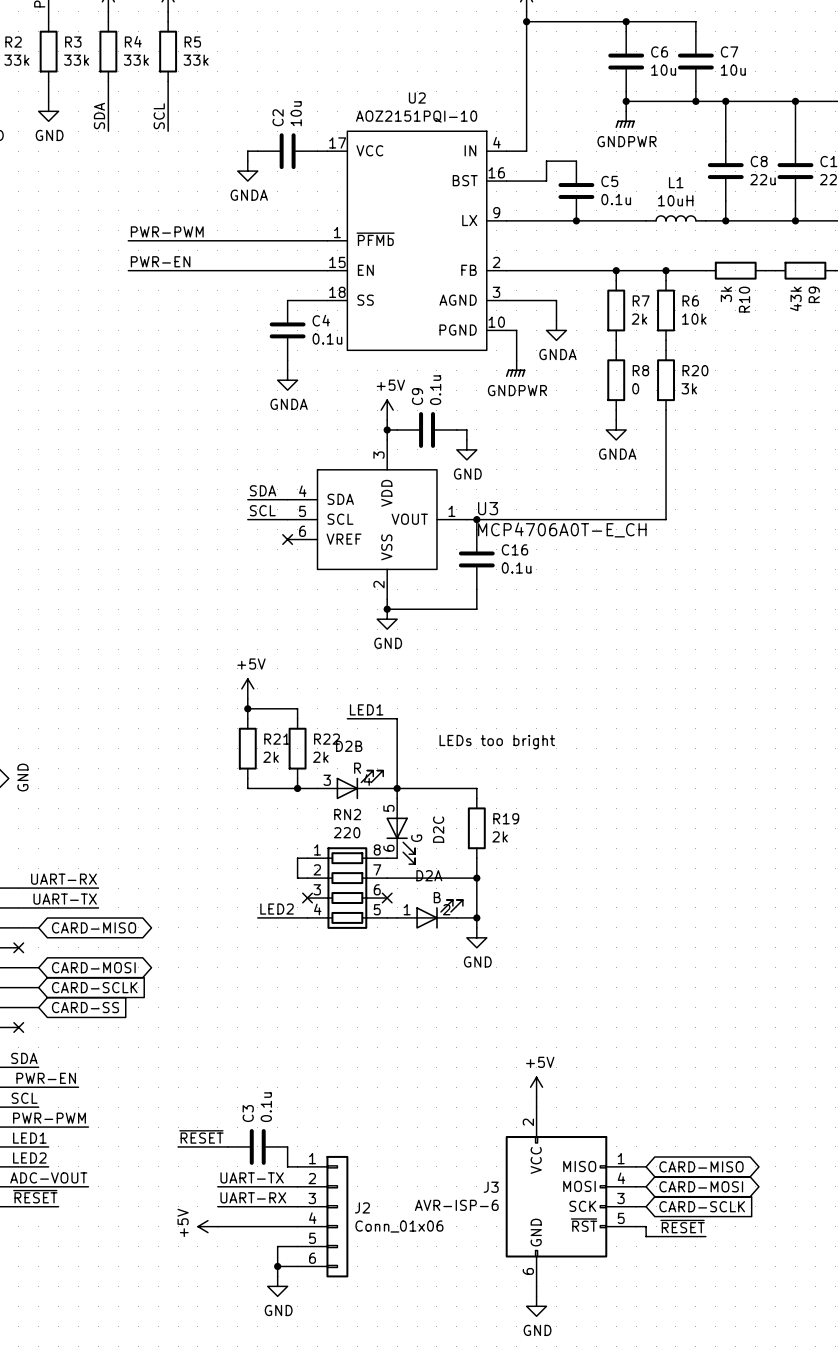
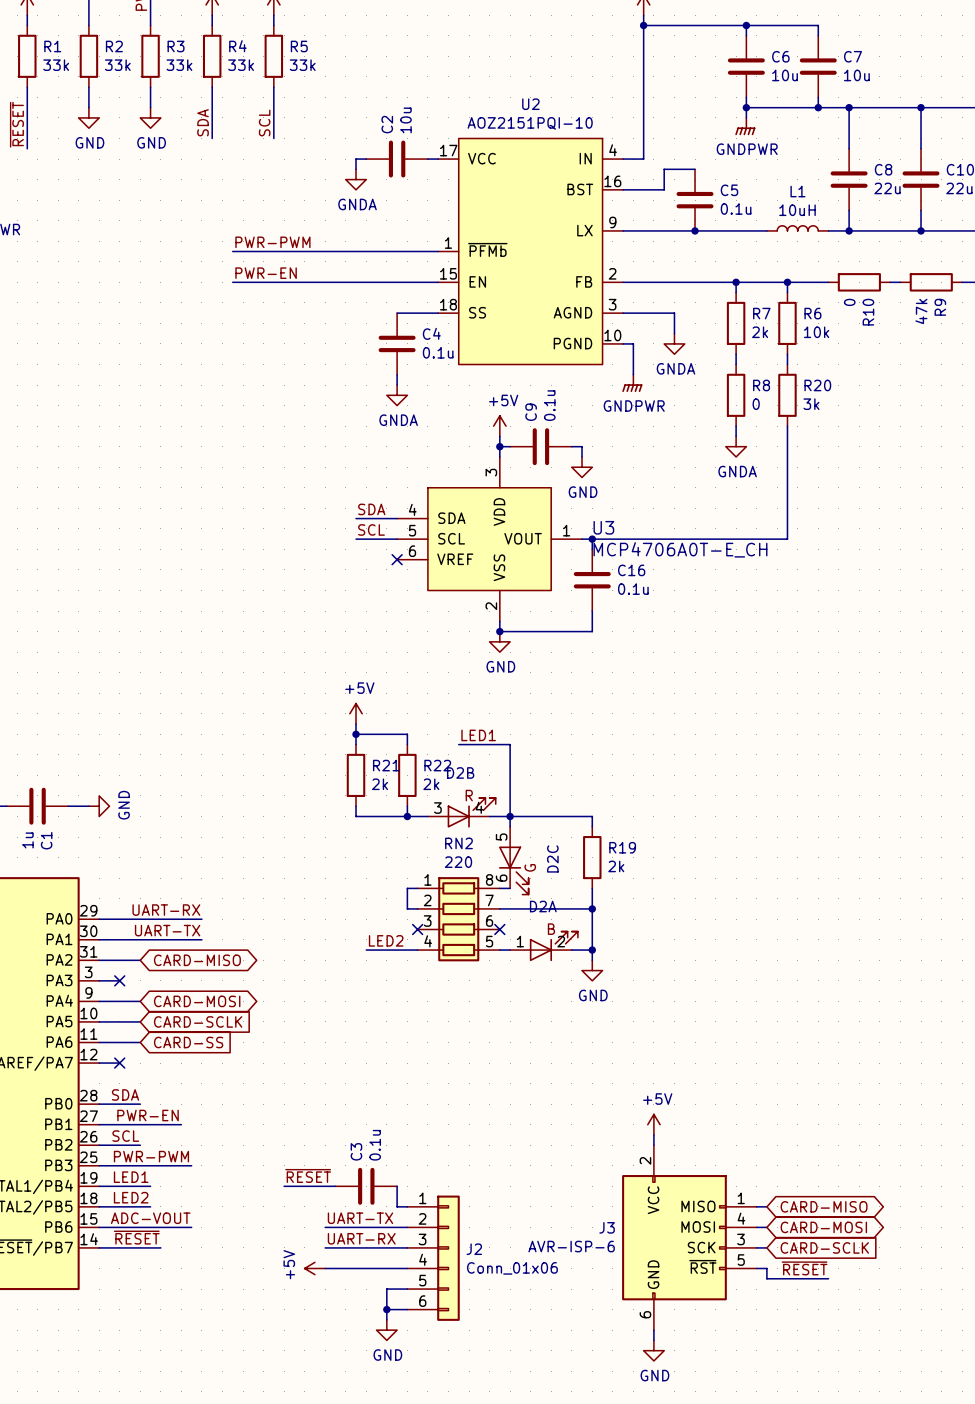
R10 value: 3k (726, 294) -> 0 (849, 302)
R9 value: 43k (795, 298) -> 47k (921, 311)
text: LEDs too bright (497, 742) -> none

